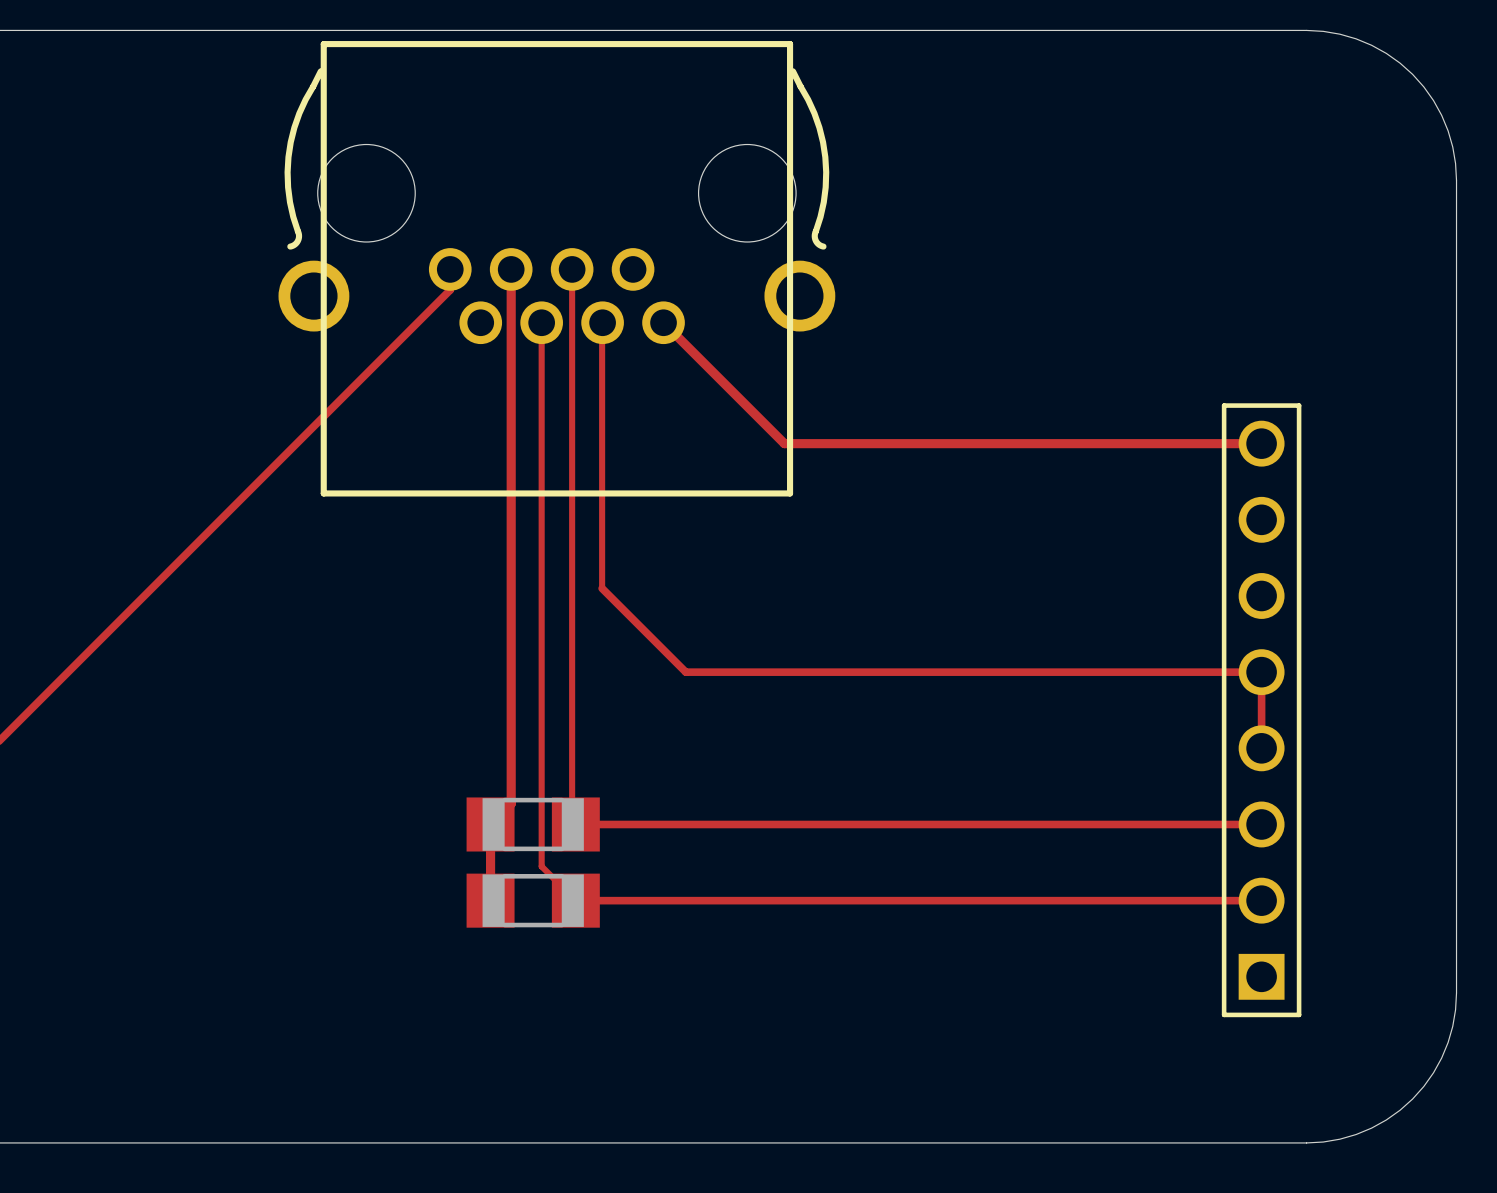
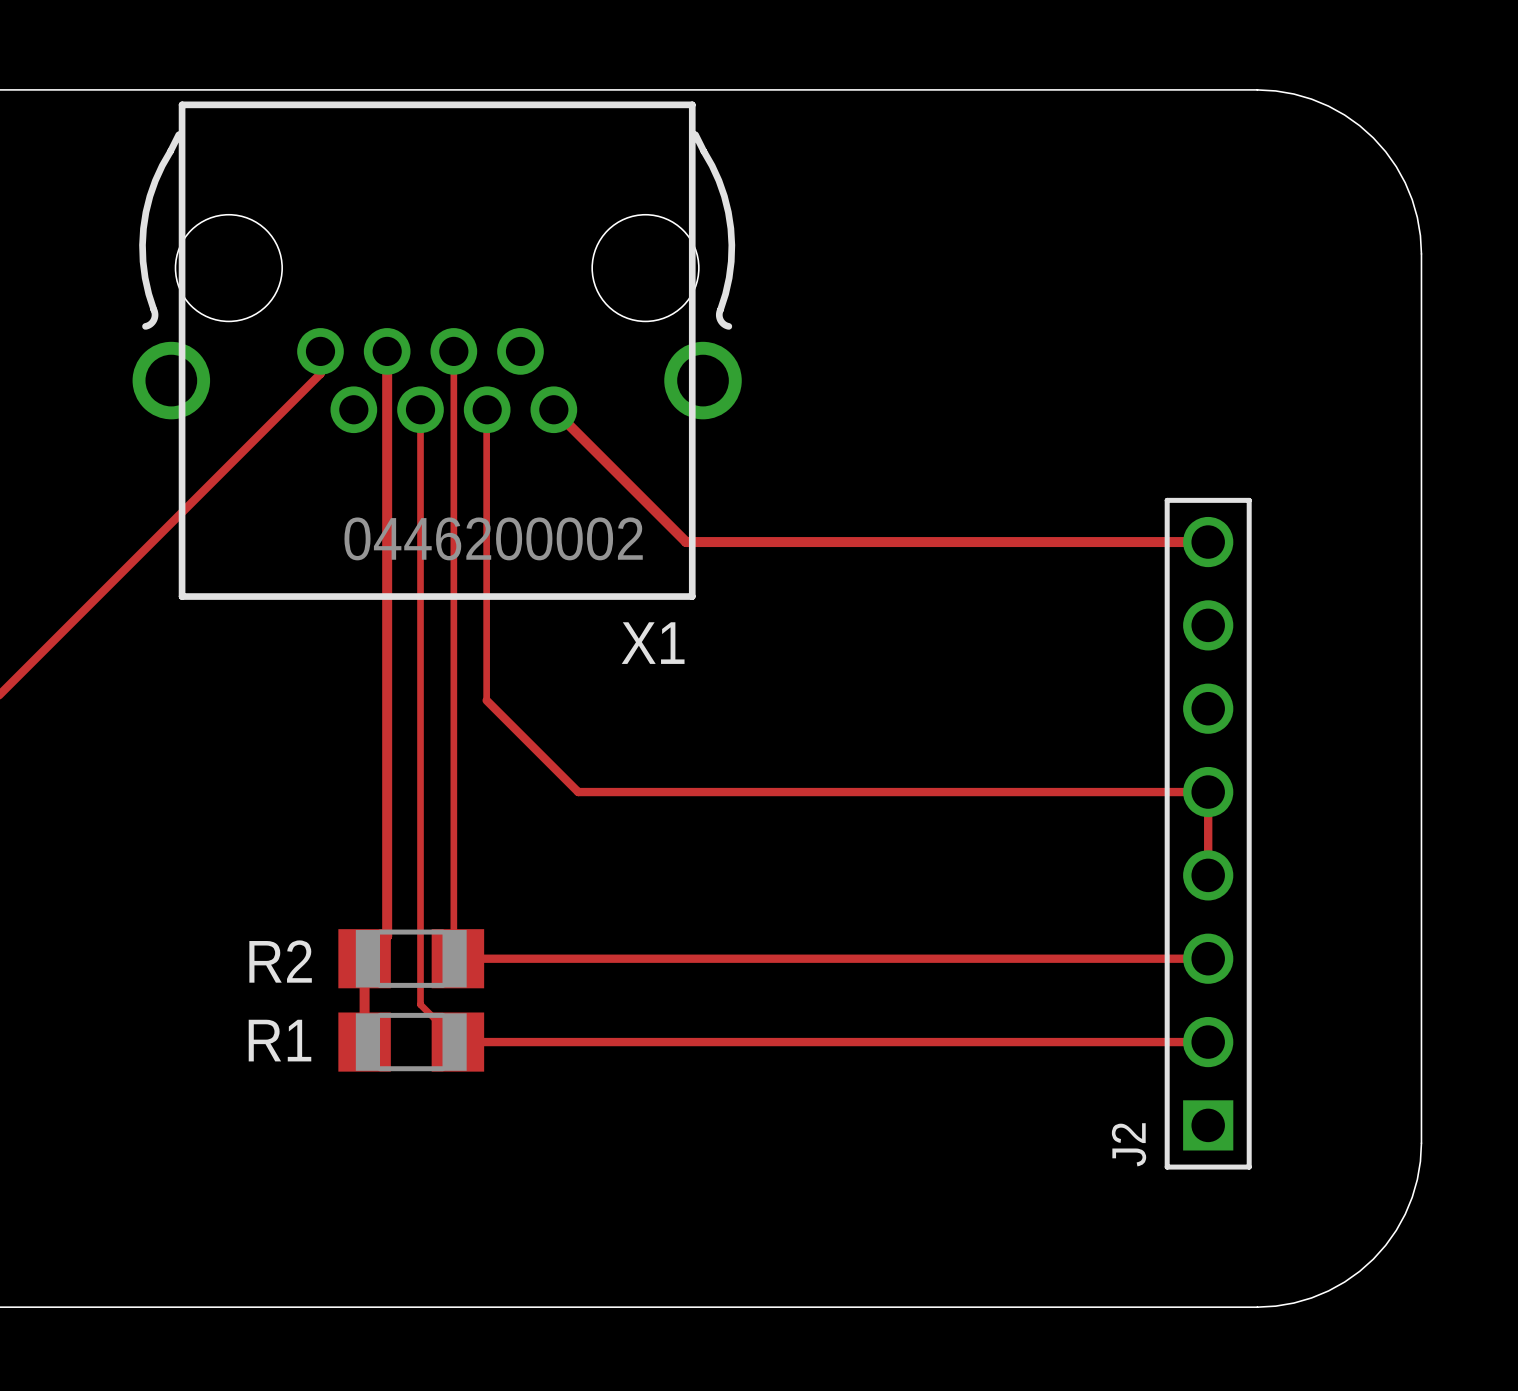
X1 value: none -> 0446200002 (493, 538)
X1 name: none -> X1 (653, 643)
R2 name: none -> R2 (280, 961)
R1 name: none -> R1 (279, 1040)
J2 name: none -> J2 (1129, 1144)

